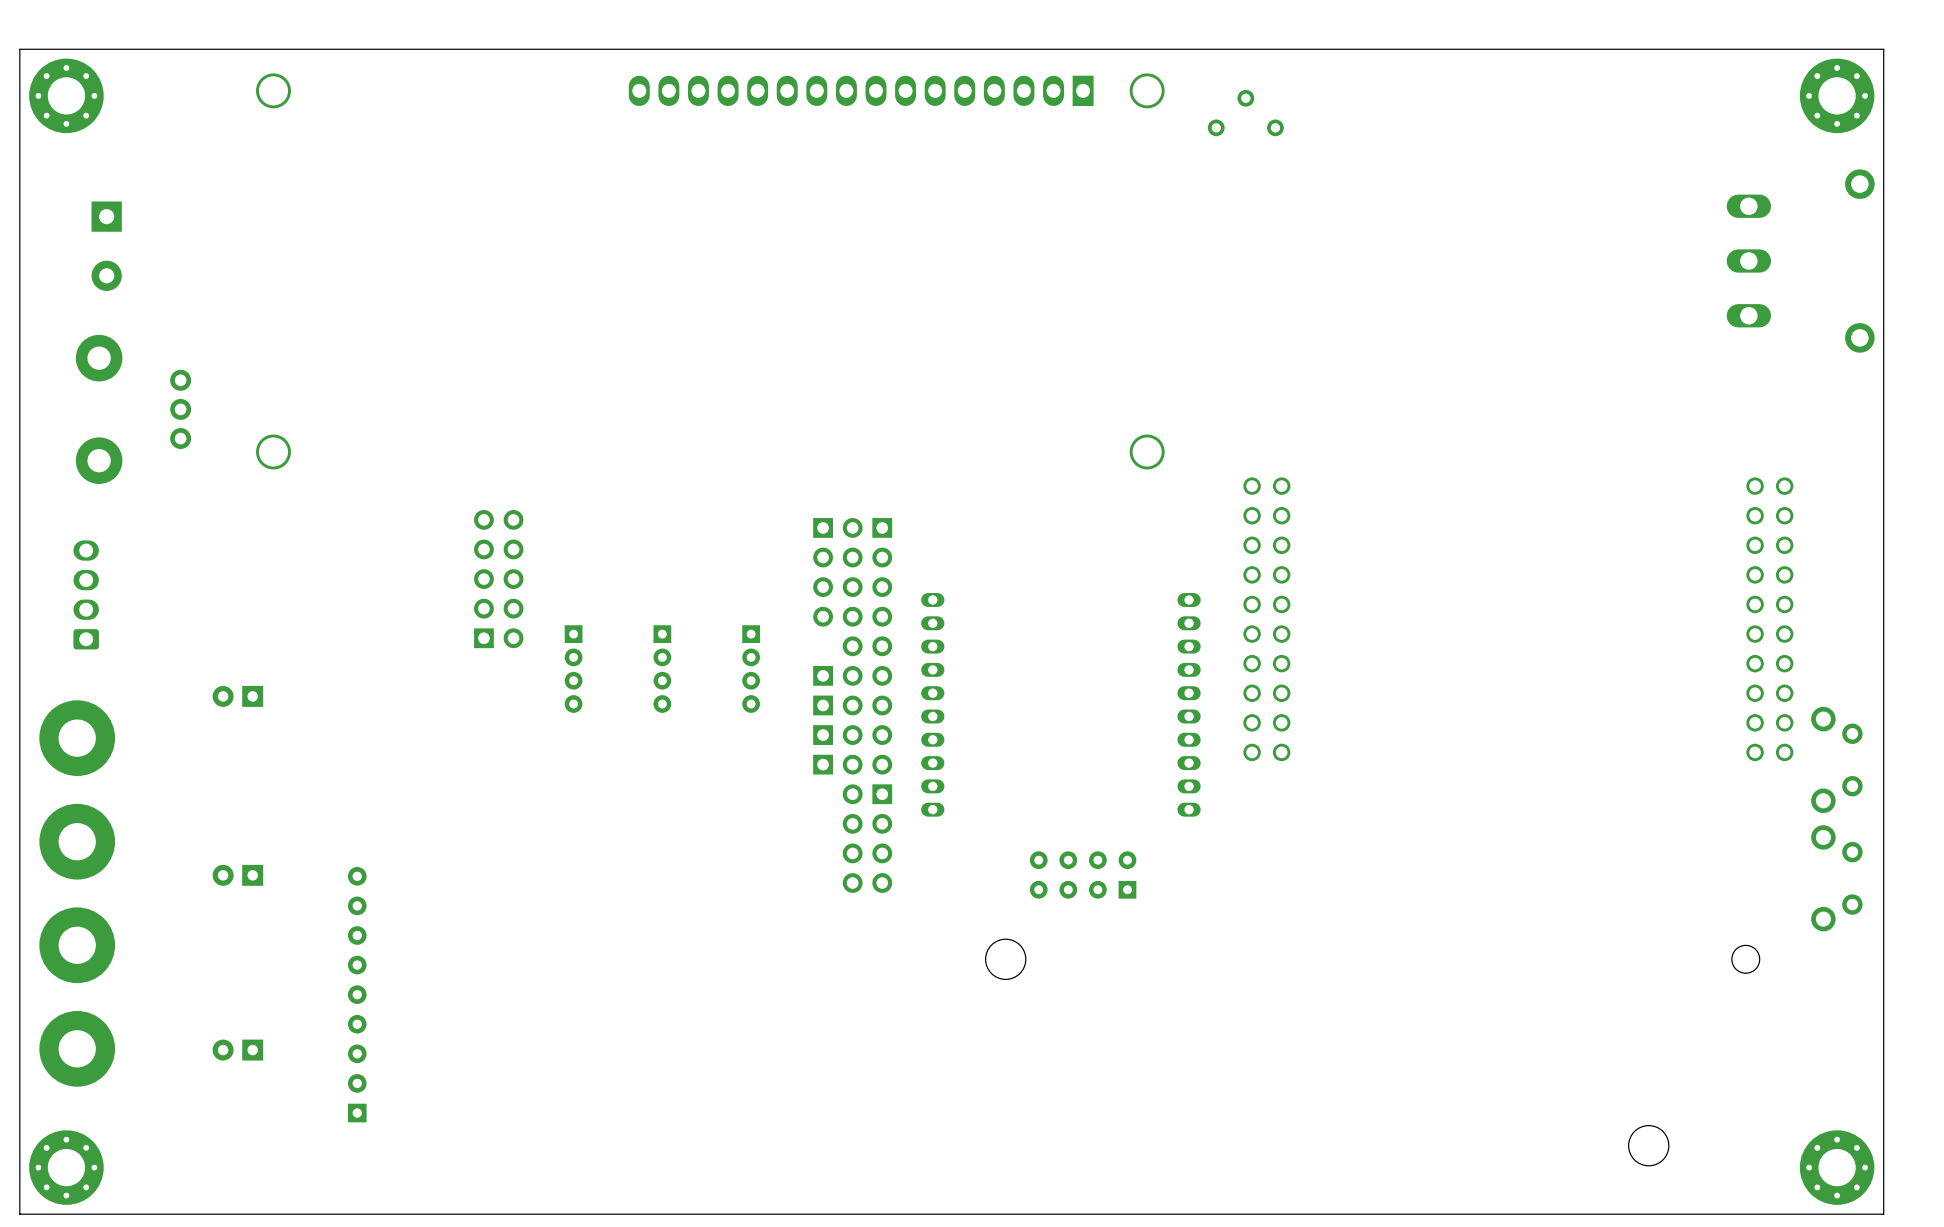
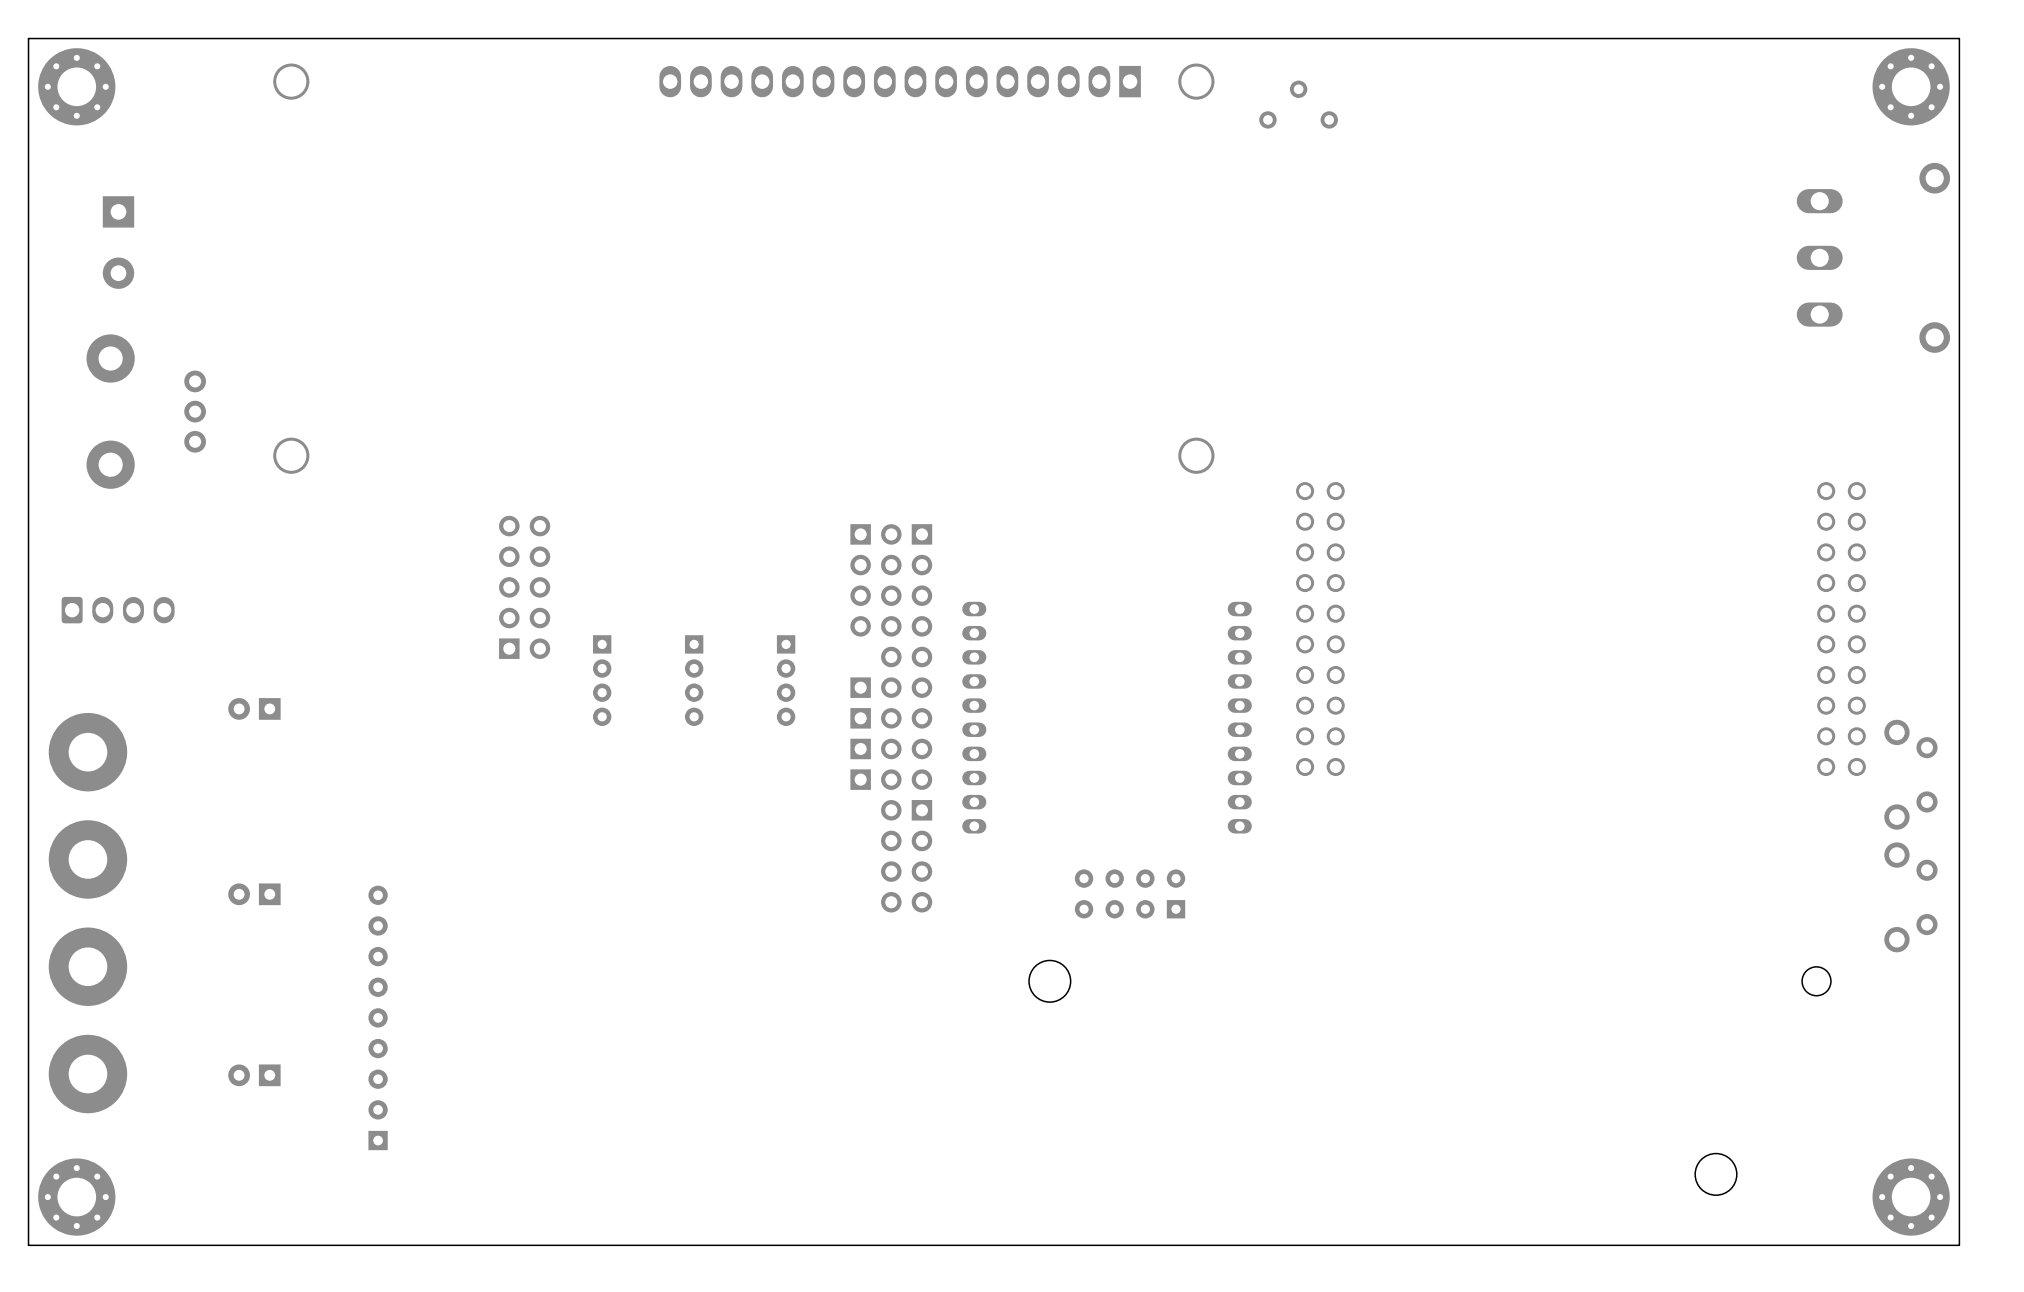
part rotation: 0° (86, 594) -> 90° clockwise (118, 610)

